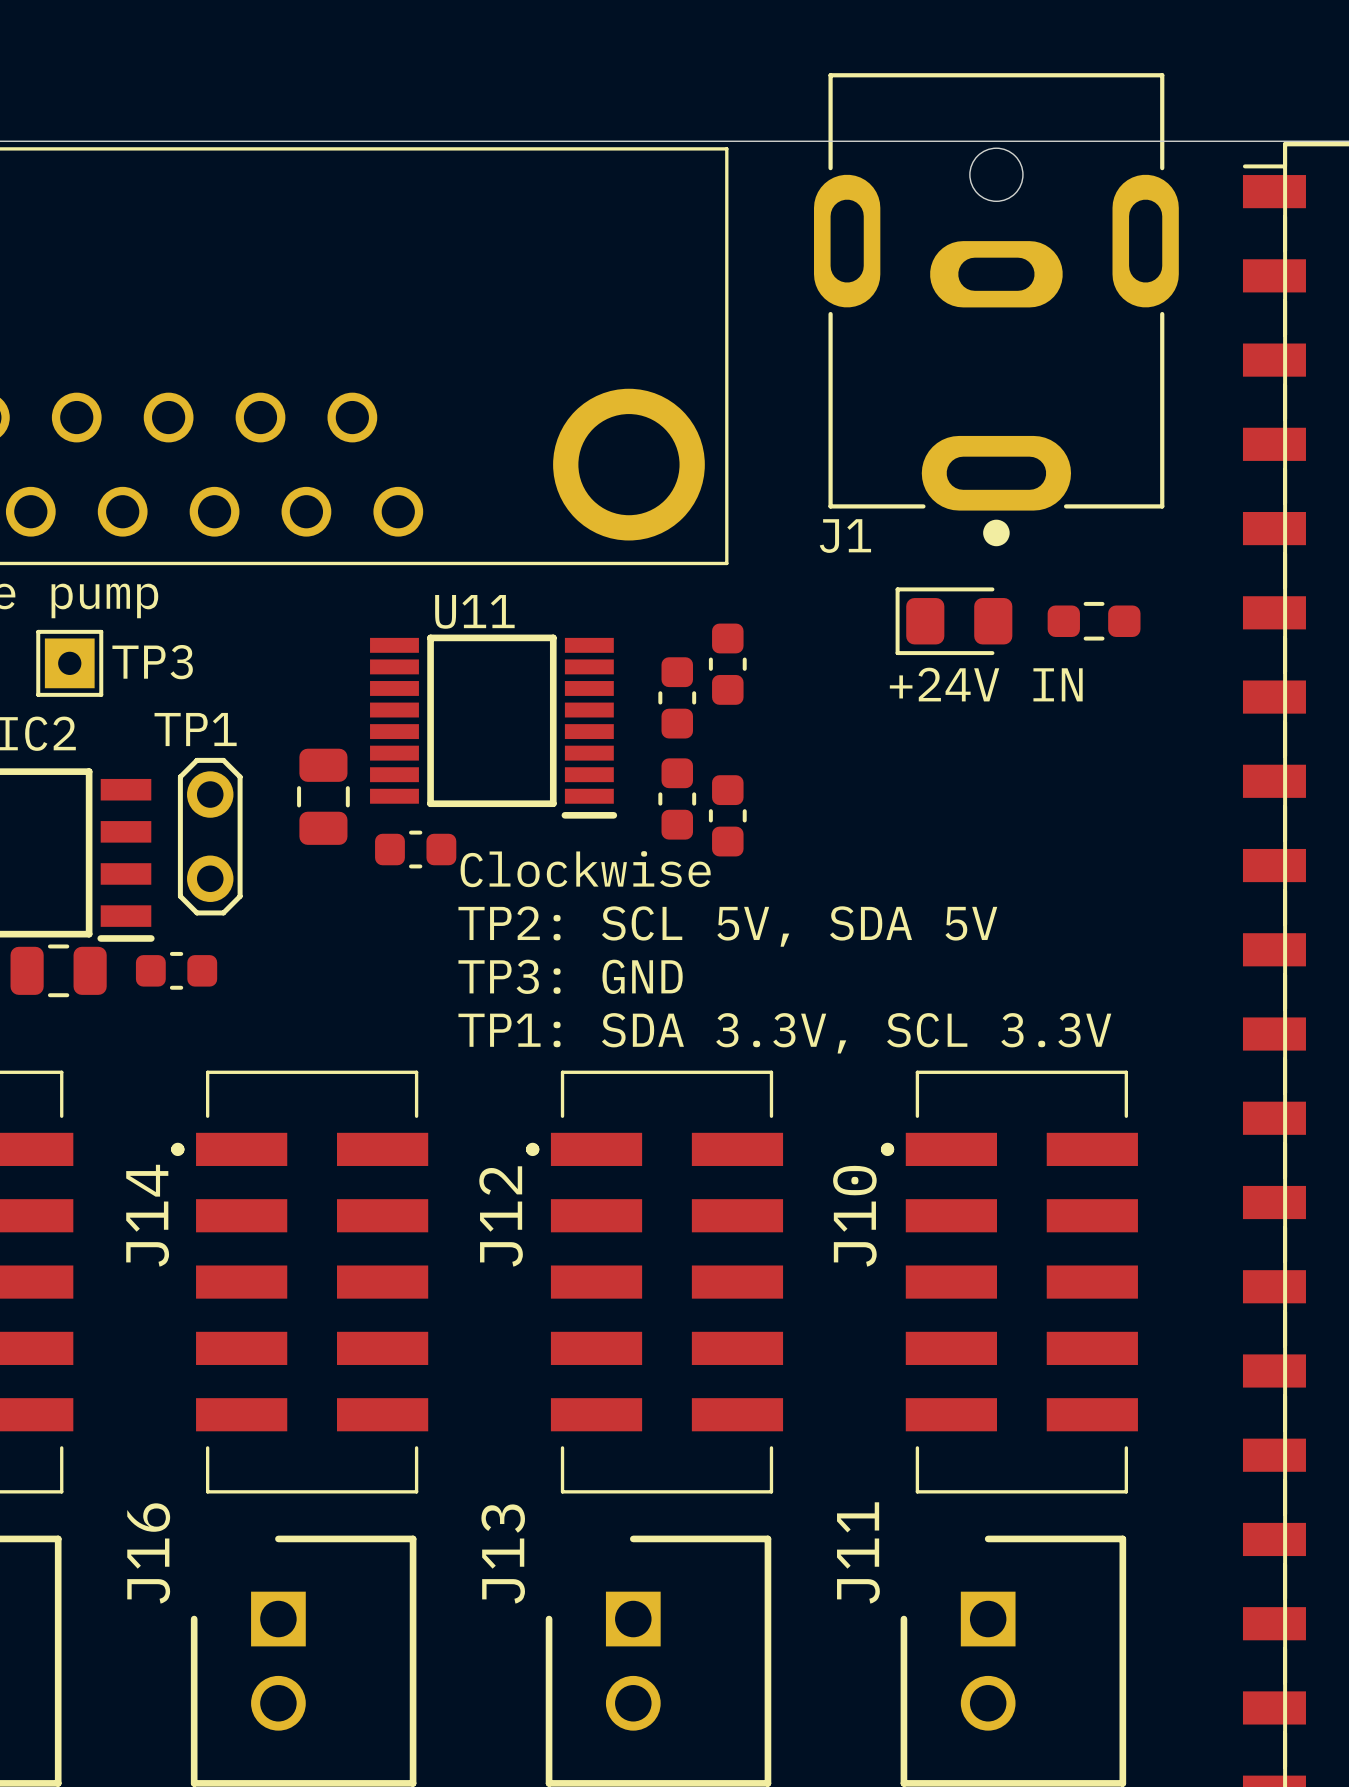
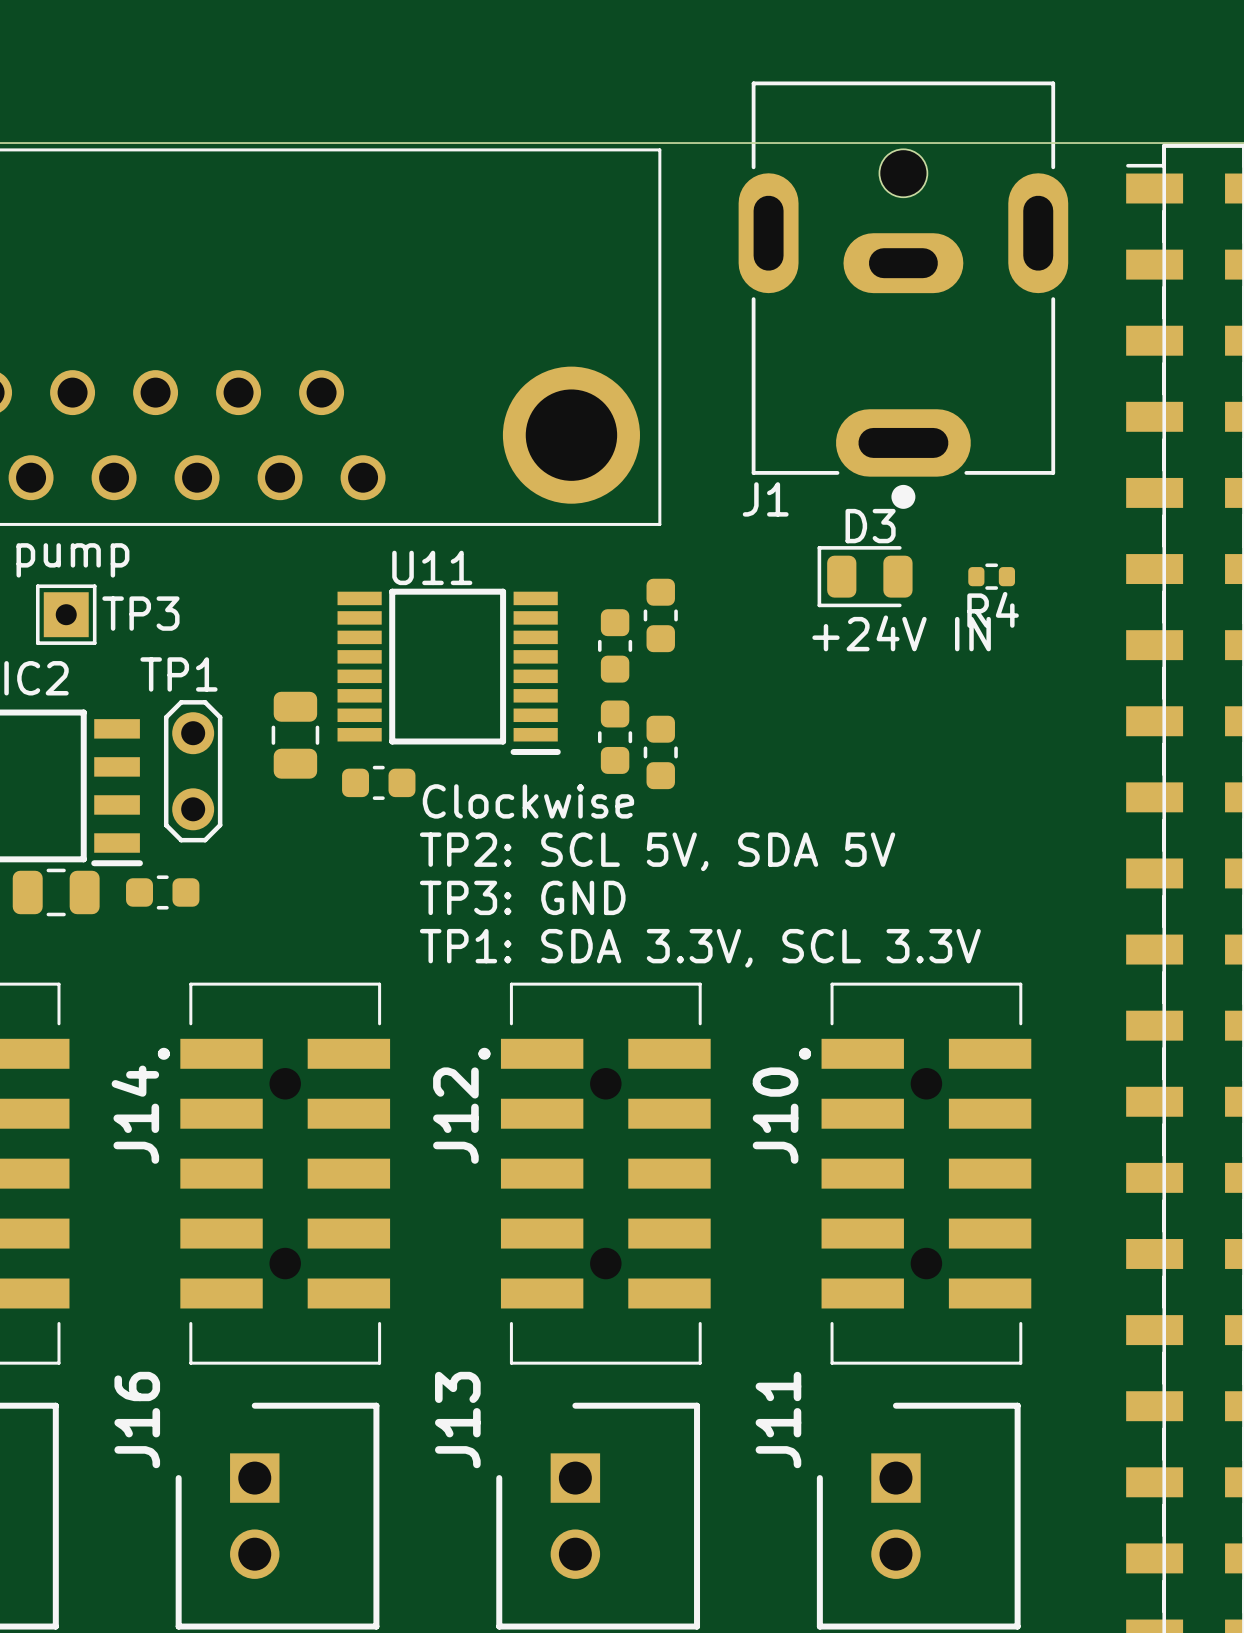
part: (953, 621) -> none
D3: none -> (865, 576)
part: (1094, 621) -> none
R4: none -> (991, 576)

